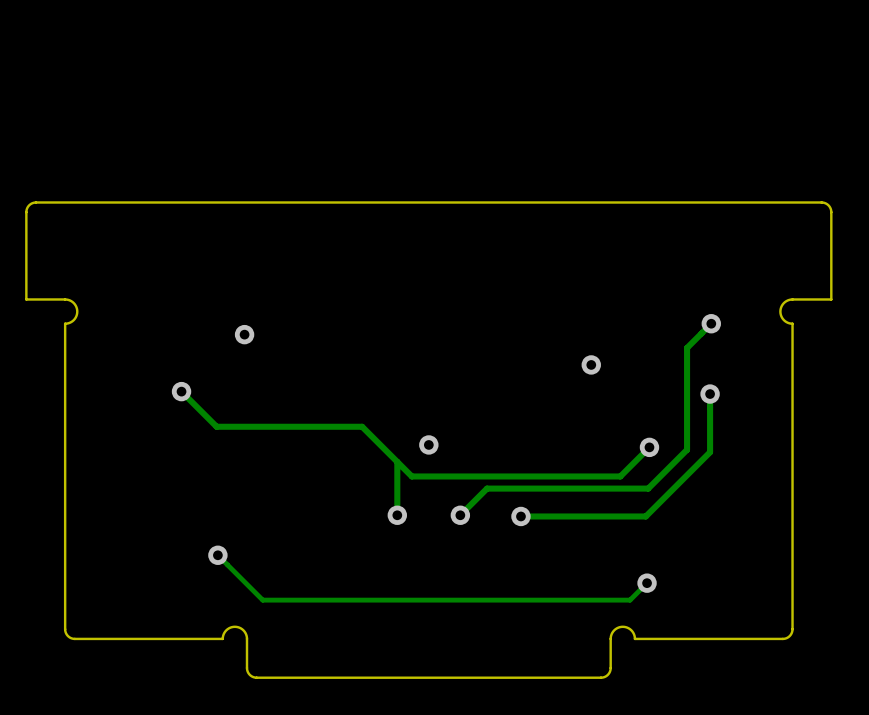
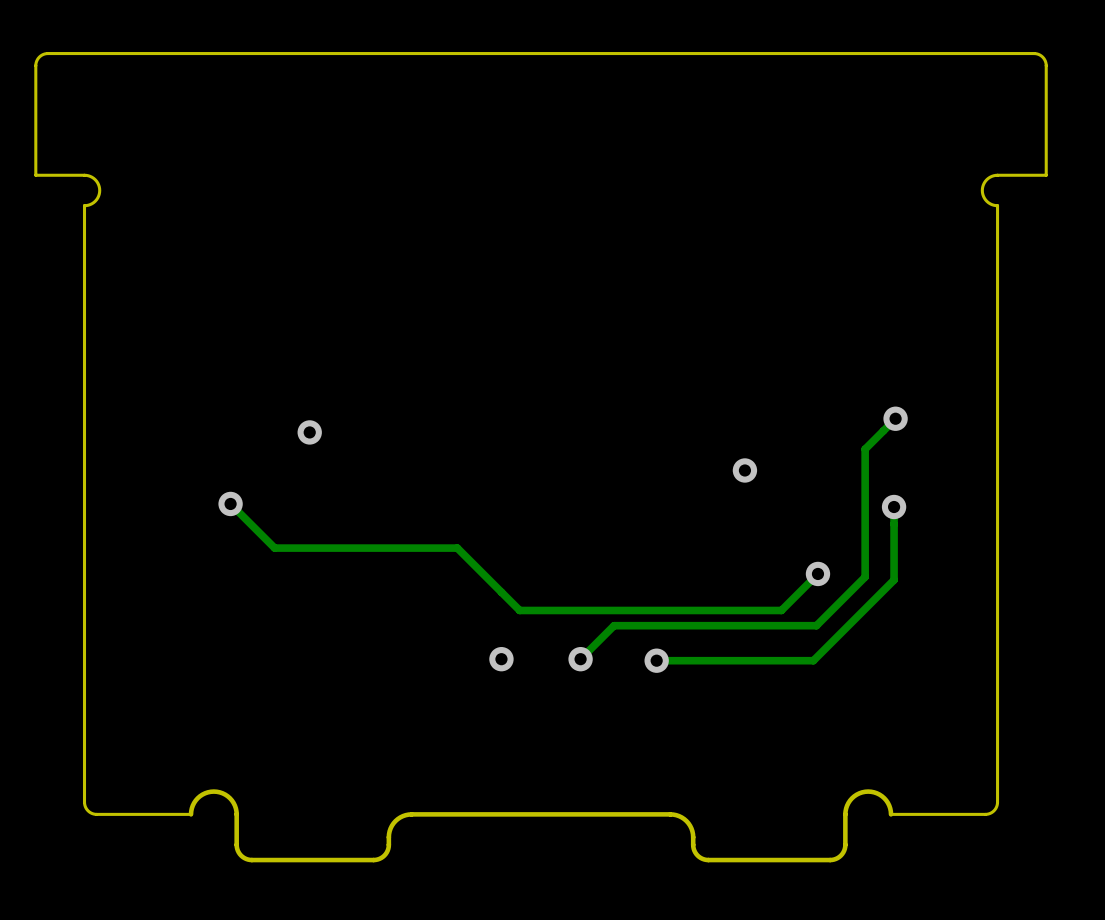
board edge: (792, 323) (785, 321) (780, 314) (781, 306) (786, 301) (831, 299) (831, 210) (828, 205) (824, 202) (33, 202) (29, 205) (26, 210) (26, 299) (71, 301) (76, 306) (76, 314) (72, 321) (65, 323) -> (997, 418) (997, 205) (986, 201) (982, 194) (982, 188) (986, 179) (993, 175) (1046, 175) (1046, 64) (1042, 57) (1035, 53) (43, 54) (38, 58) (35, 65) (35, 175) (88, 175) (95, 179) (99, 188) (99, 194) (95, 201) (84, 205) (84, 418)
via: (428, 444) -> none
track: (397, 461) (397, 515) -> none
track: (217, 555) (262, 600) (630, 600) (647, 583) -> none
via: (217, 555) -> none
via: (647, 583) -> none
drawing: none -> [188, 789, 894, 863]
board edge: (707, 638) (634, 638) (630, 629) (624, 626) (618, 627) (613, 631) (610, 637) (609, 671) (606, 675) (600, 677) (255, 677) (249, 674) (247, 670) (246, 637) (244, 631) (239, 627) (233, 626) (227, 629) (222, 638) (150, 638) -> none

